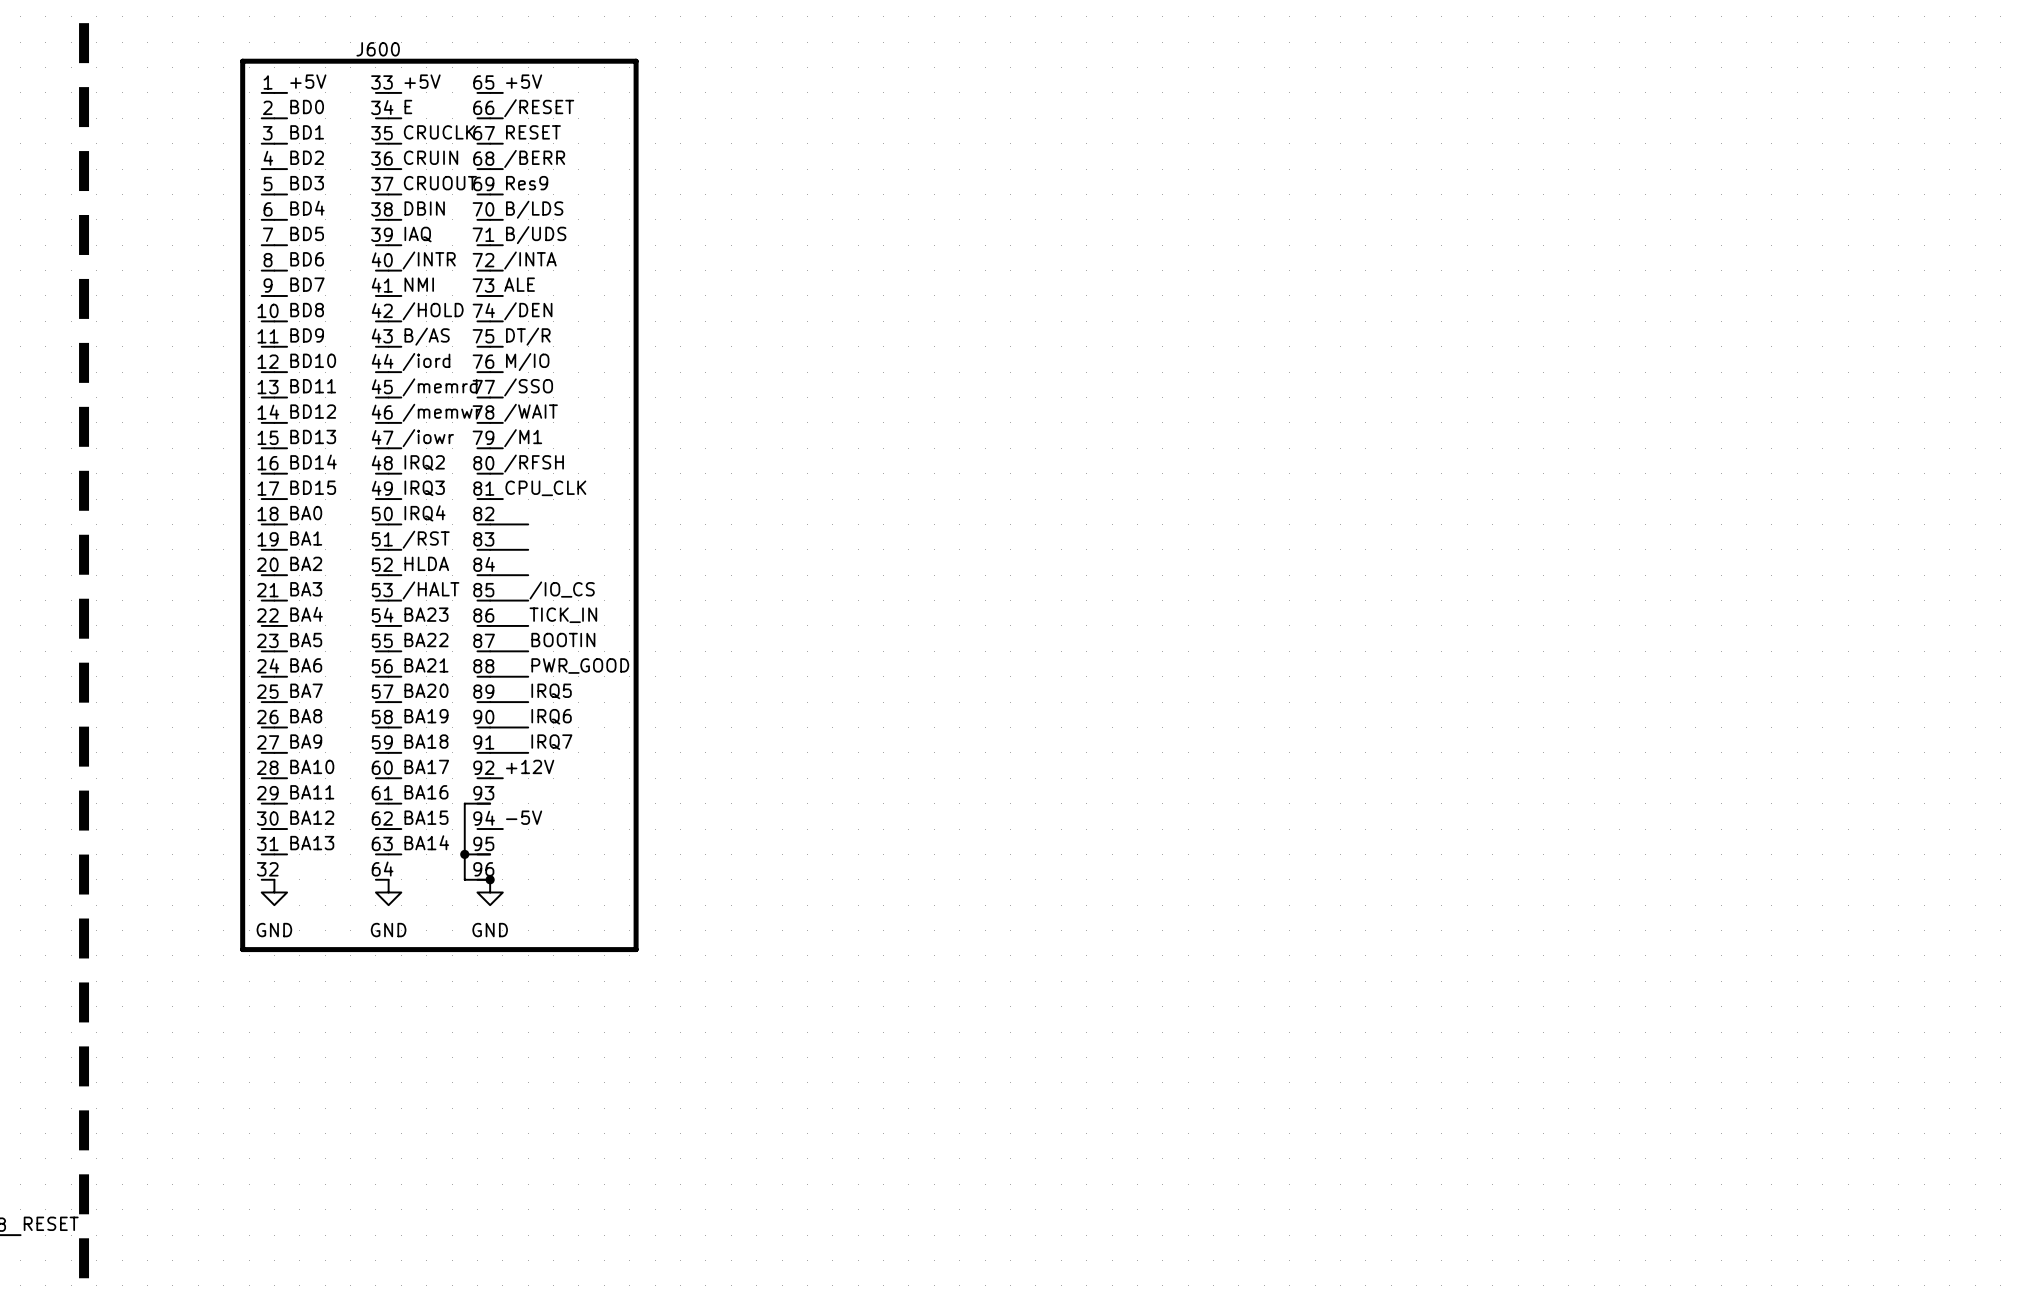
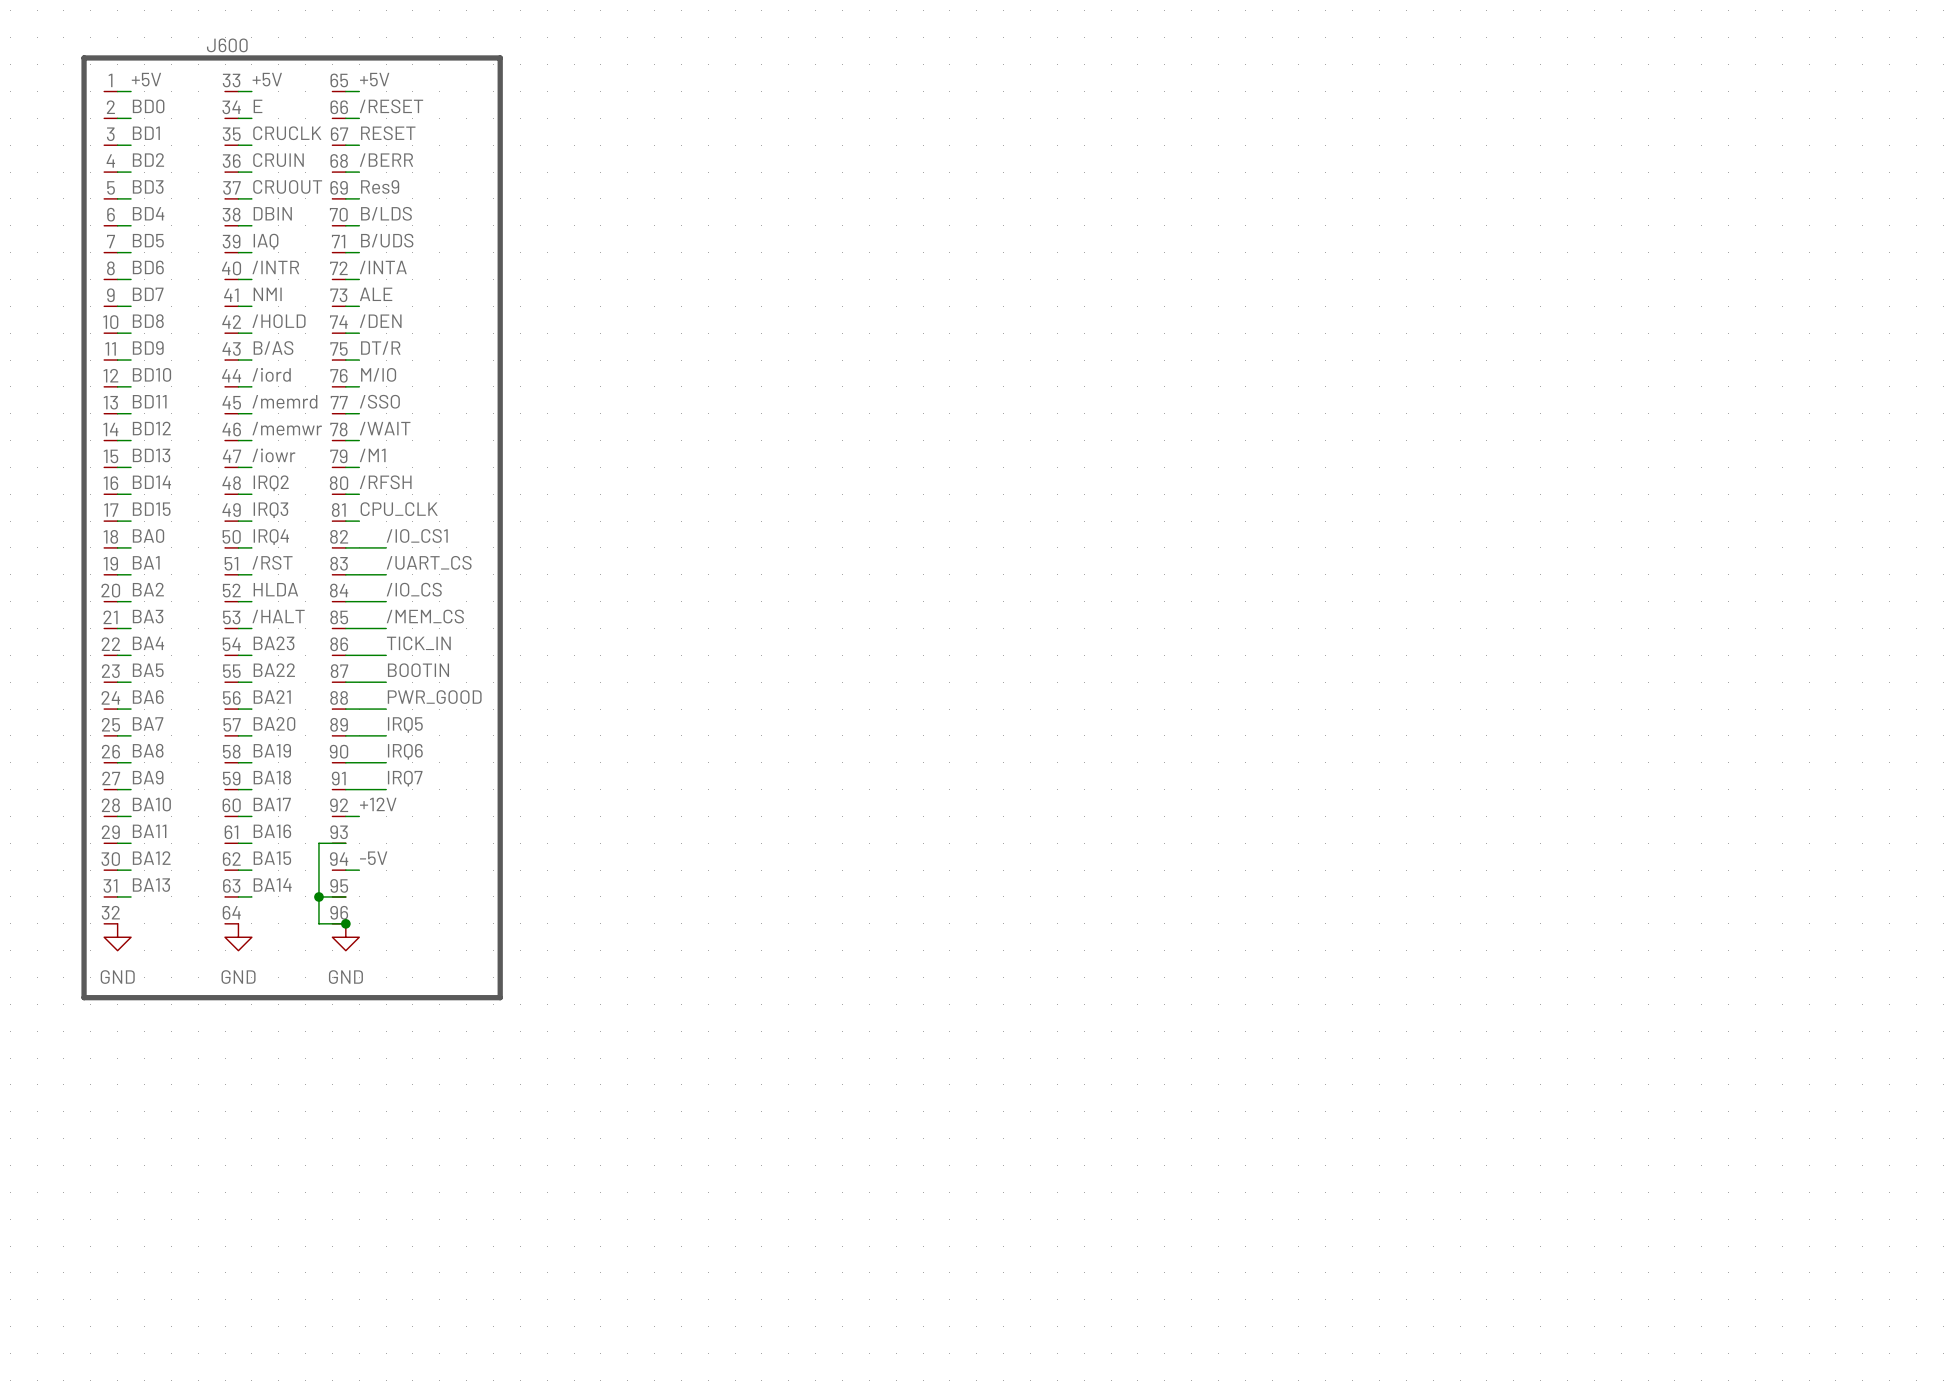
label: none -> /IO_CS1 (417, 535)
label: none -> /UART_CS (429, 562)
label: none -> /IO_CS (414, 589)
label: /IO_CS (562, 590) -> /MEM_CS (425, 616)

